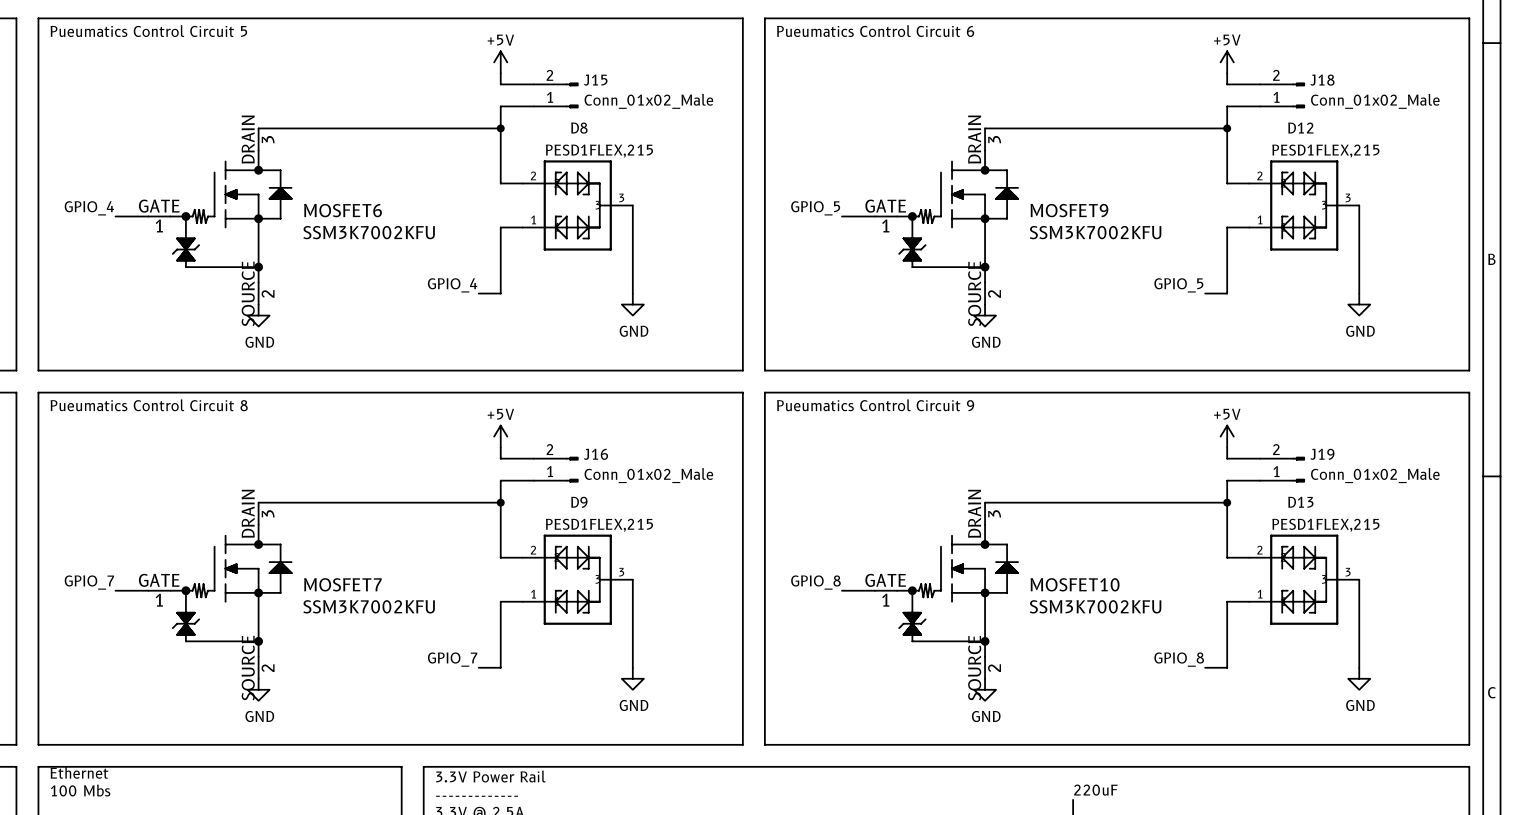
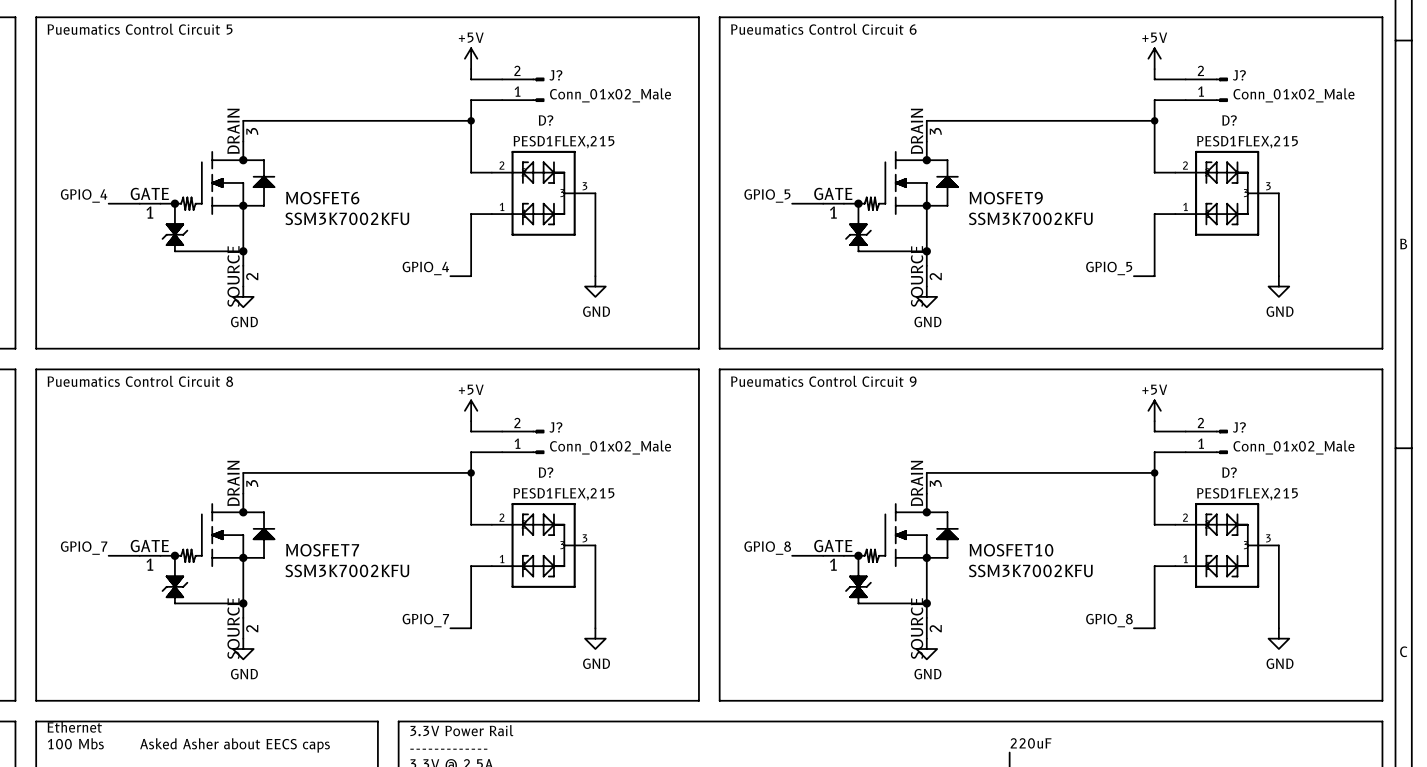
J15 name: J15 (595, 80) -> J? (555, 75)
J18 name: J18 (1322, 80) -> J? (1239, 75)
D8 name: D8 (579, 128) -> D? (546, 120)
D12 name: D12 (1300, 128) -> D? (1229, 120)
J16 name: J16 (595, 454) -> J? (555, 427)
J19 name: J19 (1322, 454) -> J? (1239, 427)
D9 name: D9 (579, 502) -> D? (546, 472)
D13 name: D13 (1300, 502) -> D? (1229, 472)
text: none -> Asked Asher about EECS caps (235, 745)

